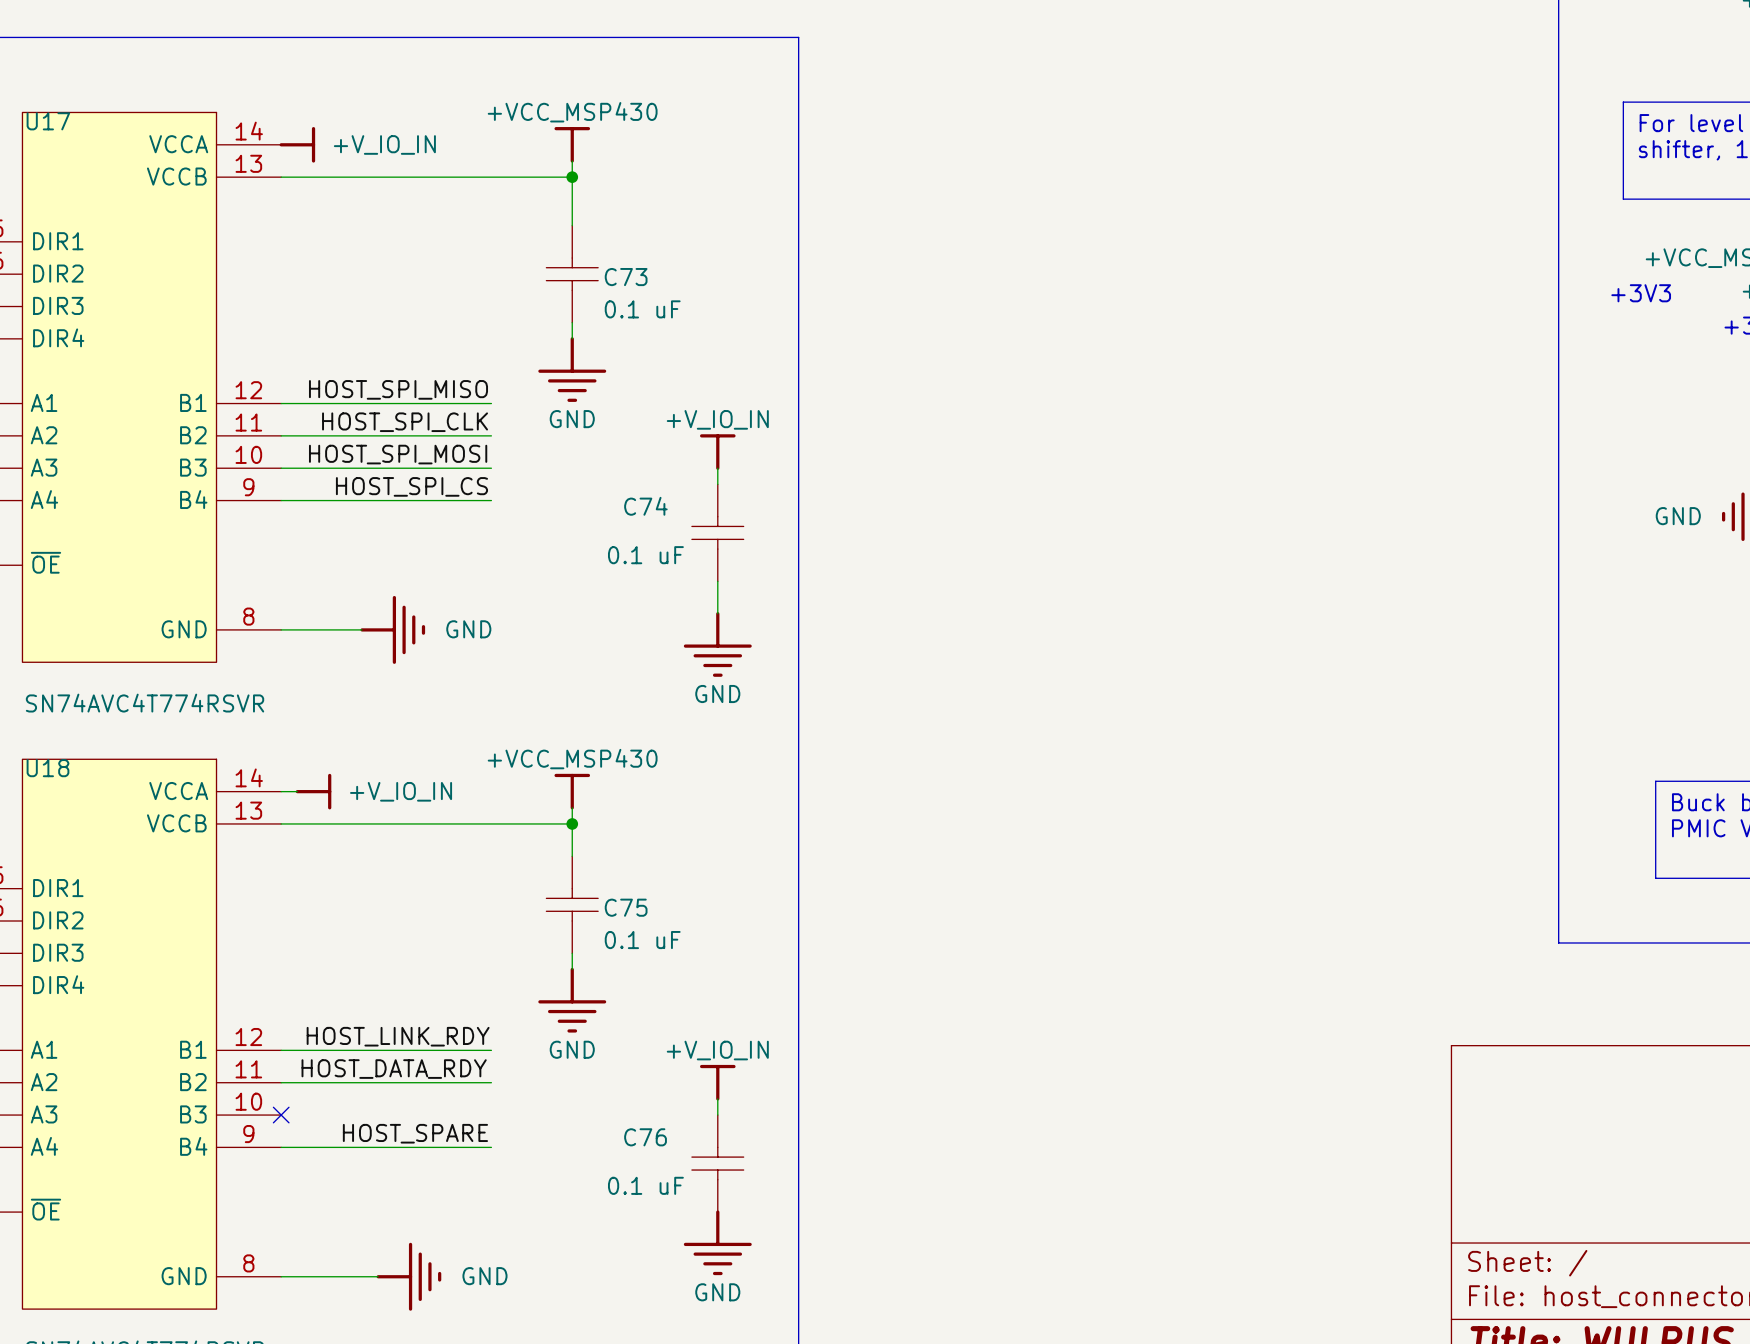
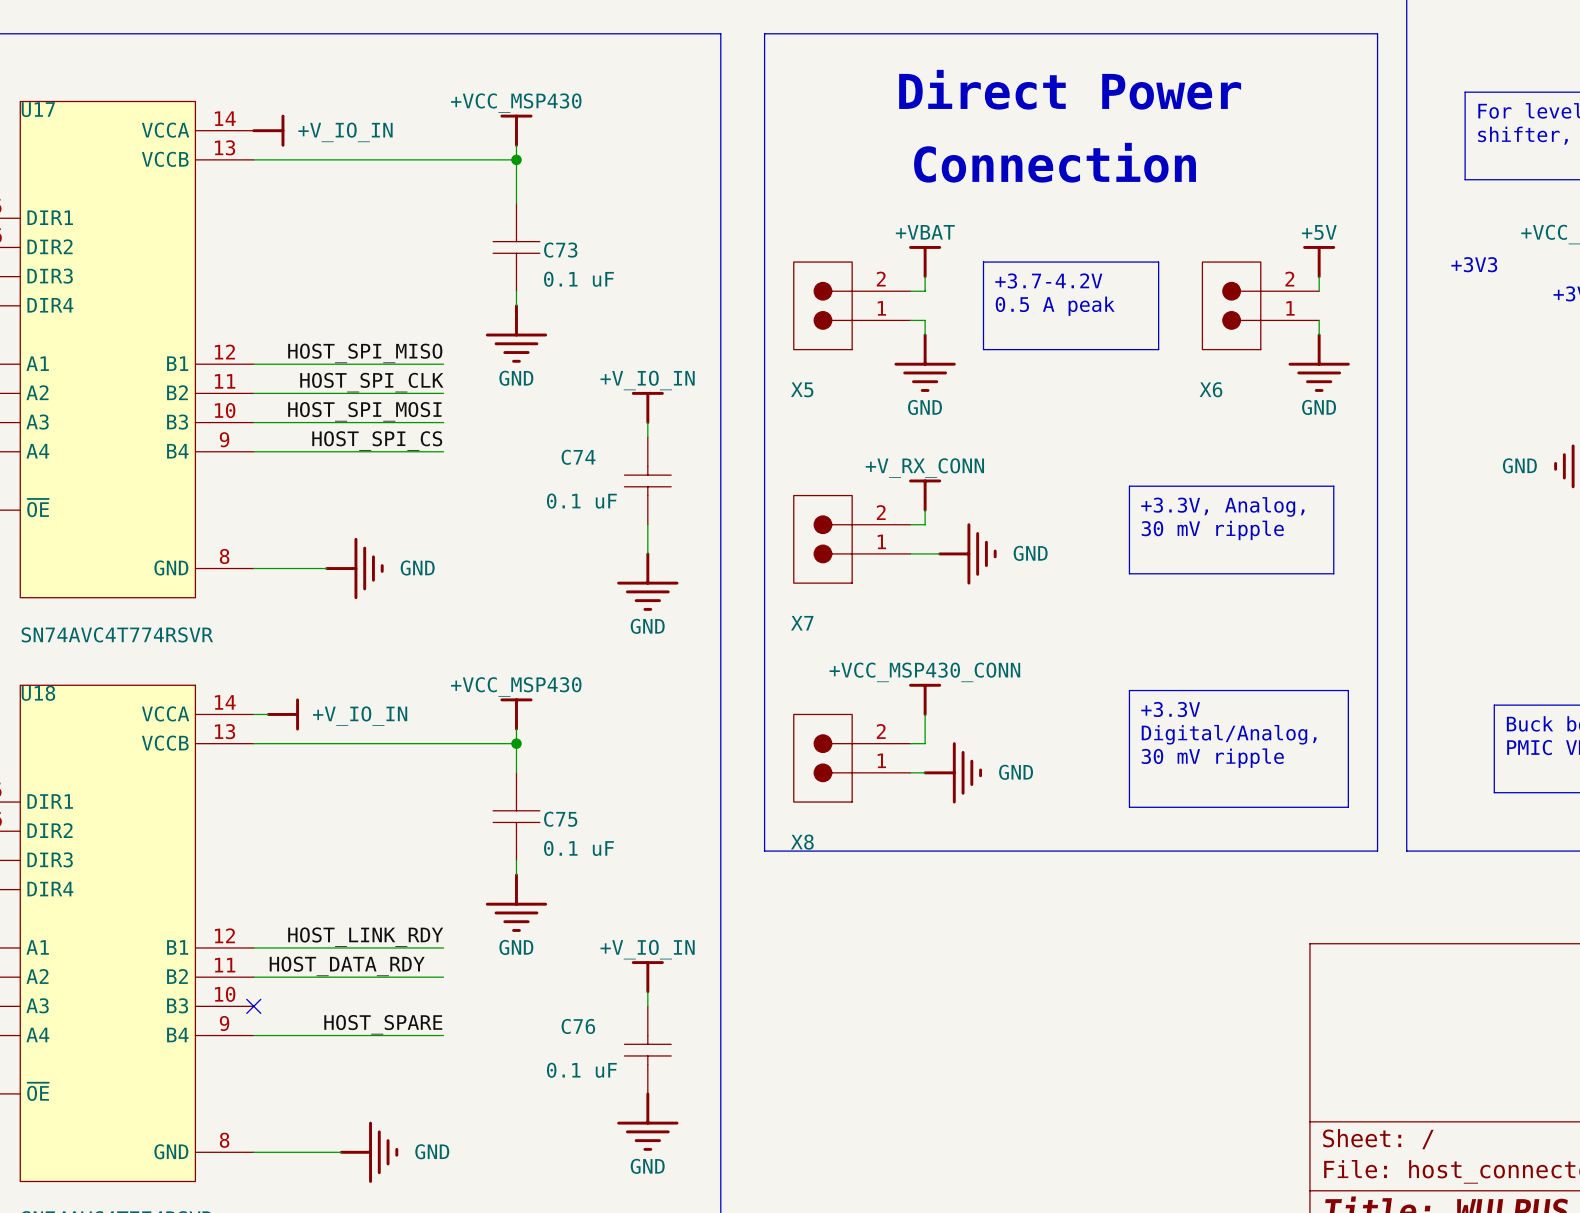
line: none -> (764, 33) (1377, 33) (1377, 851) (764, 851) (764, 33)
text: none -> Direct Power (1070, 89)
text: none -> Connection (1055, 162)
power symbol: none -> +VBAT (925, 262)
line: none -> (983, 262) (1158, 262) (1158, 349) (983, 349) (983, 262)
power symbol: none -> +5V (1319, 262)
wire: none -> (925, 276) (925, 291) (910, 291)
wire: none -> (1319, 276) (1319, 291)
text: none -> +3.7-4.2V (1048, 280)
X5: none -> (852, 305)
X6: none -> (1260, 305)
text: none -> 0.5 A peak (1055, 306)
wire: none -> (910, 320) (925, 320) (925, 335)
wire: none -> (1319, 320) (1319, 335)
power symbol: none -> GND (925, 362)
power symbol: none -> GND (1319, 362)
line: none -> (1129, 486) (1333, 486) (1333, 573) (1129, 573) (1129, 486)
power symbol: none -> +V_RX_CONN (925, 495)
text: none -> +3.3V, Analog, (1222, 506)
wire: none -> (925, 510) (925, 524) (910, 524)
text: none -> 30 mV ripple (1212, 530)
X7: none -> (852, 539)
wire: none -> (910, 553) (939, 553)
power symbol: none -> GND (967, 553)
line: none -> (1129, 690) (1129, 807) (1348, 807) (1348, 690) (1129, 690)
power symbol: none -> +VCC_MSP430_CONN (925, 699)
text: none -> +3.3V (1170, 709)
wire: none -> (925, 714) (925, 743) (910, 743)
text: none -> Digital/Analog, (1229, 734)
X8: none -> (852, 758)
text: none -> 30 mV ripple (1212, 758)
wire: none -> (910, 772) (925, 772)
power symbol: none -> GND (952, 772)

